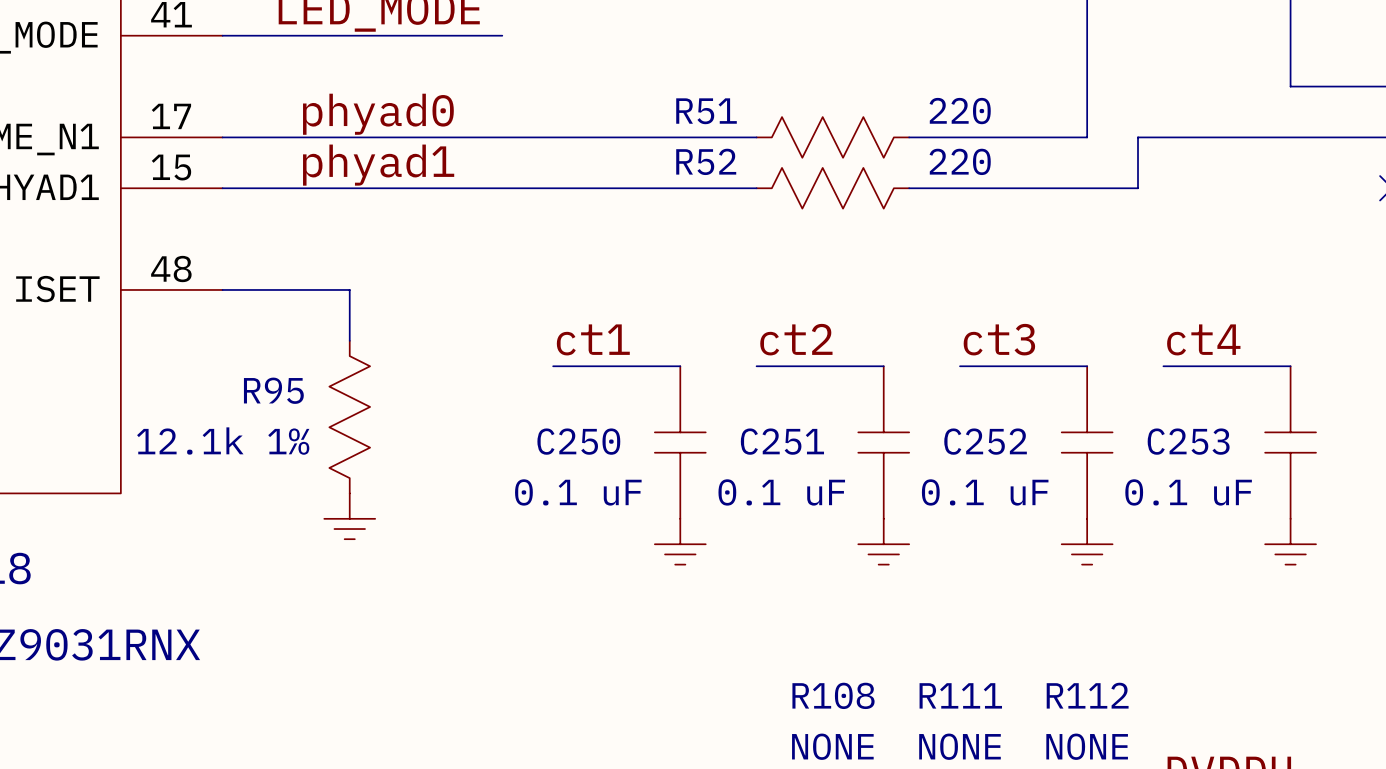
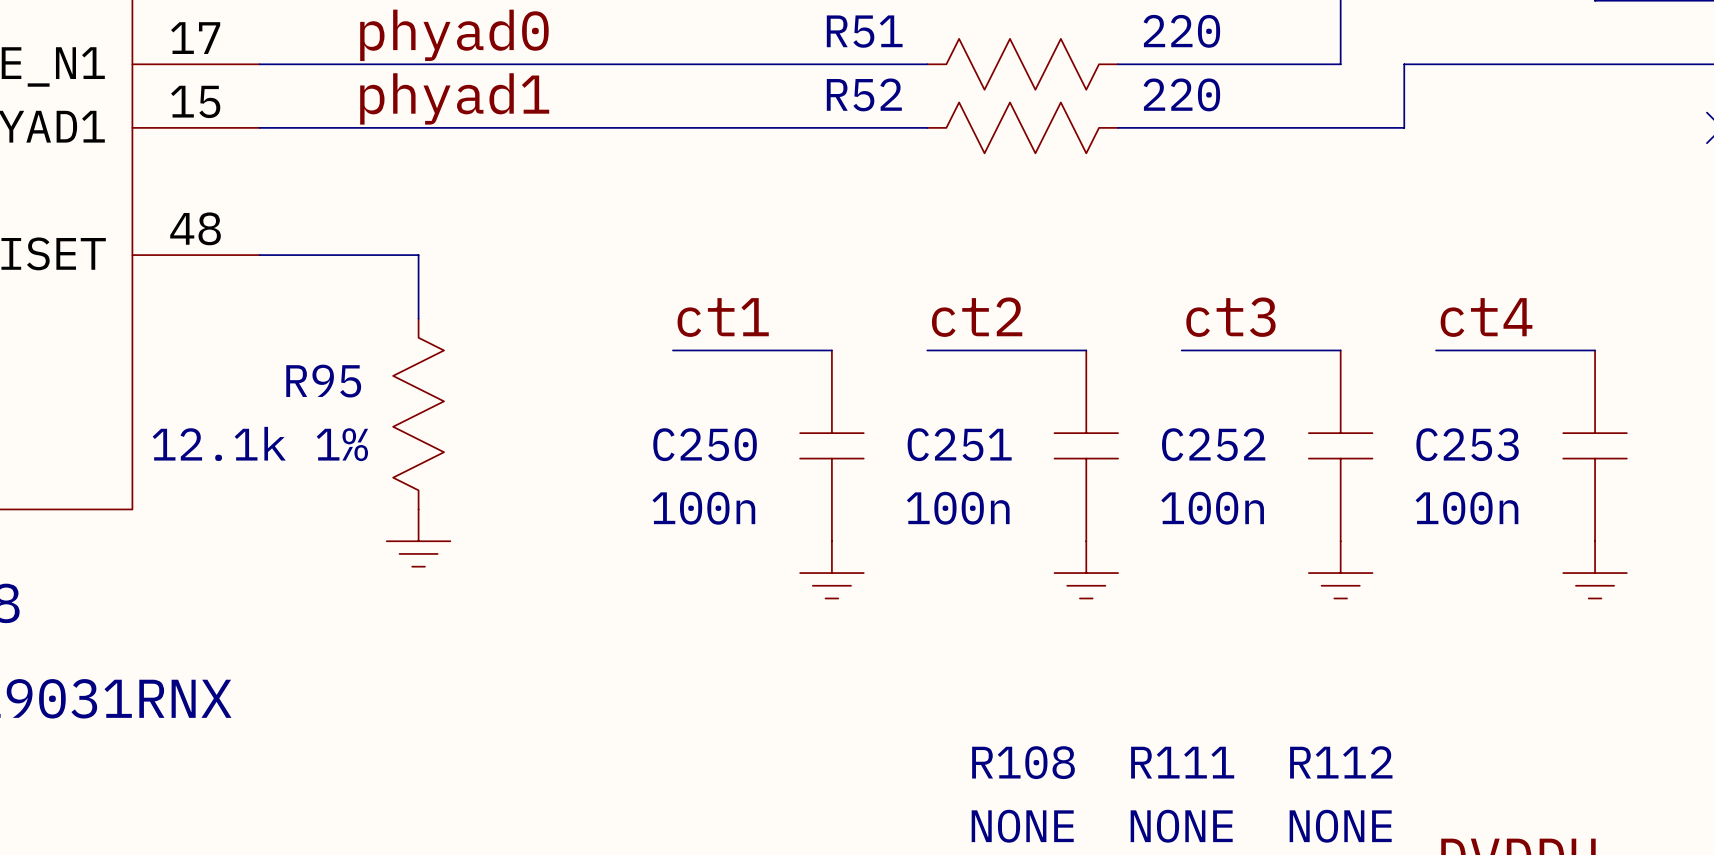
C250 value: 0.1 uF (578, 492) -> 100n (703, 508)
C251 value: 0.1 uF (781, 492) -> 100n (958, 508)
C252 value: 0.1 uF (985, 492) -> 100n (1212, 508)
C253 value: 0.1 uF (1188, 492) -> 100n (1466, 508)

